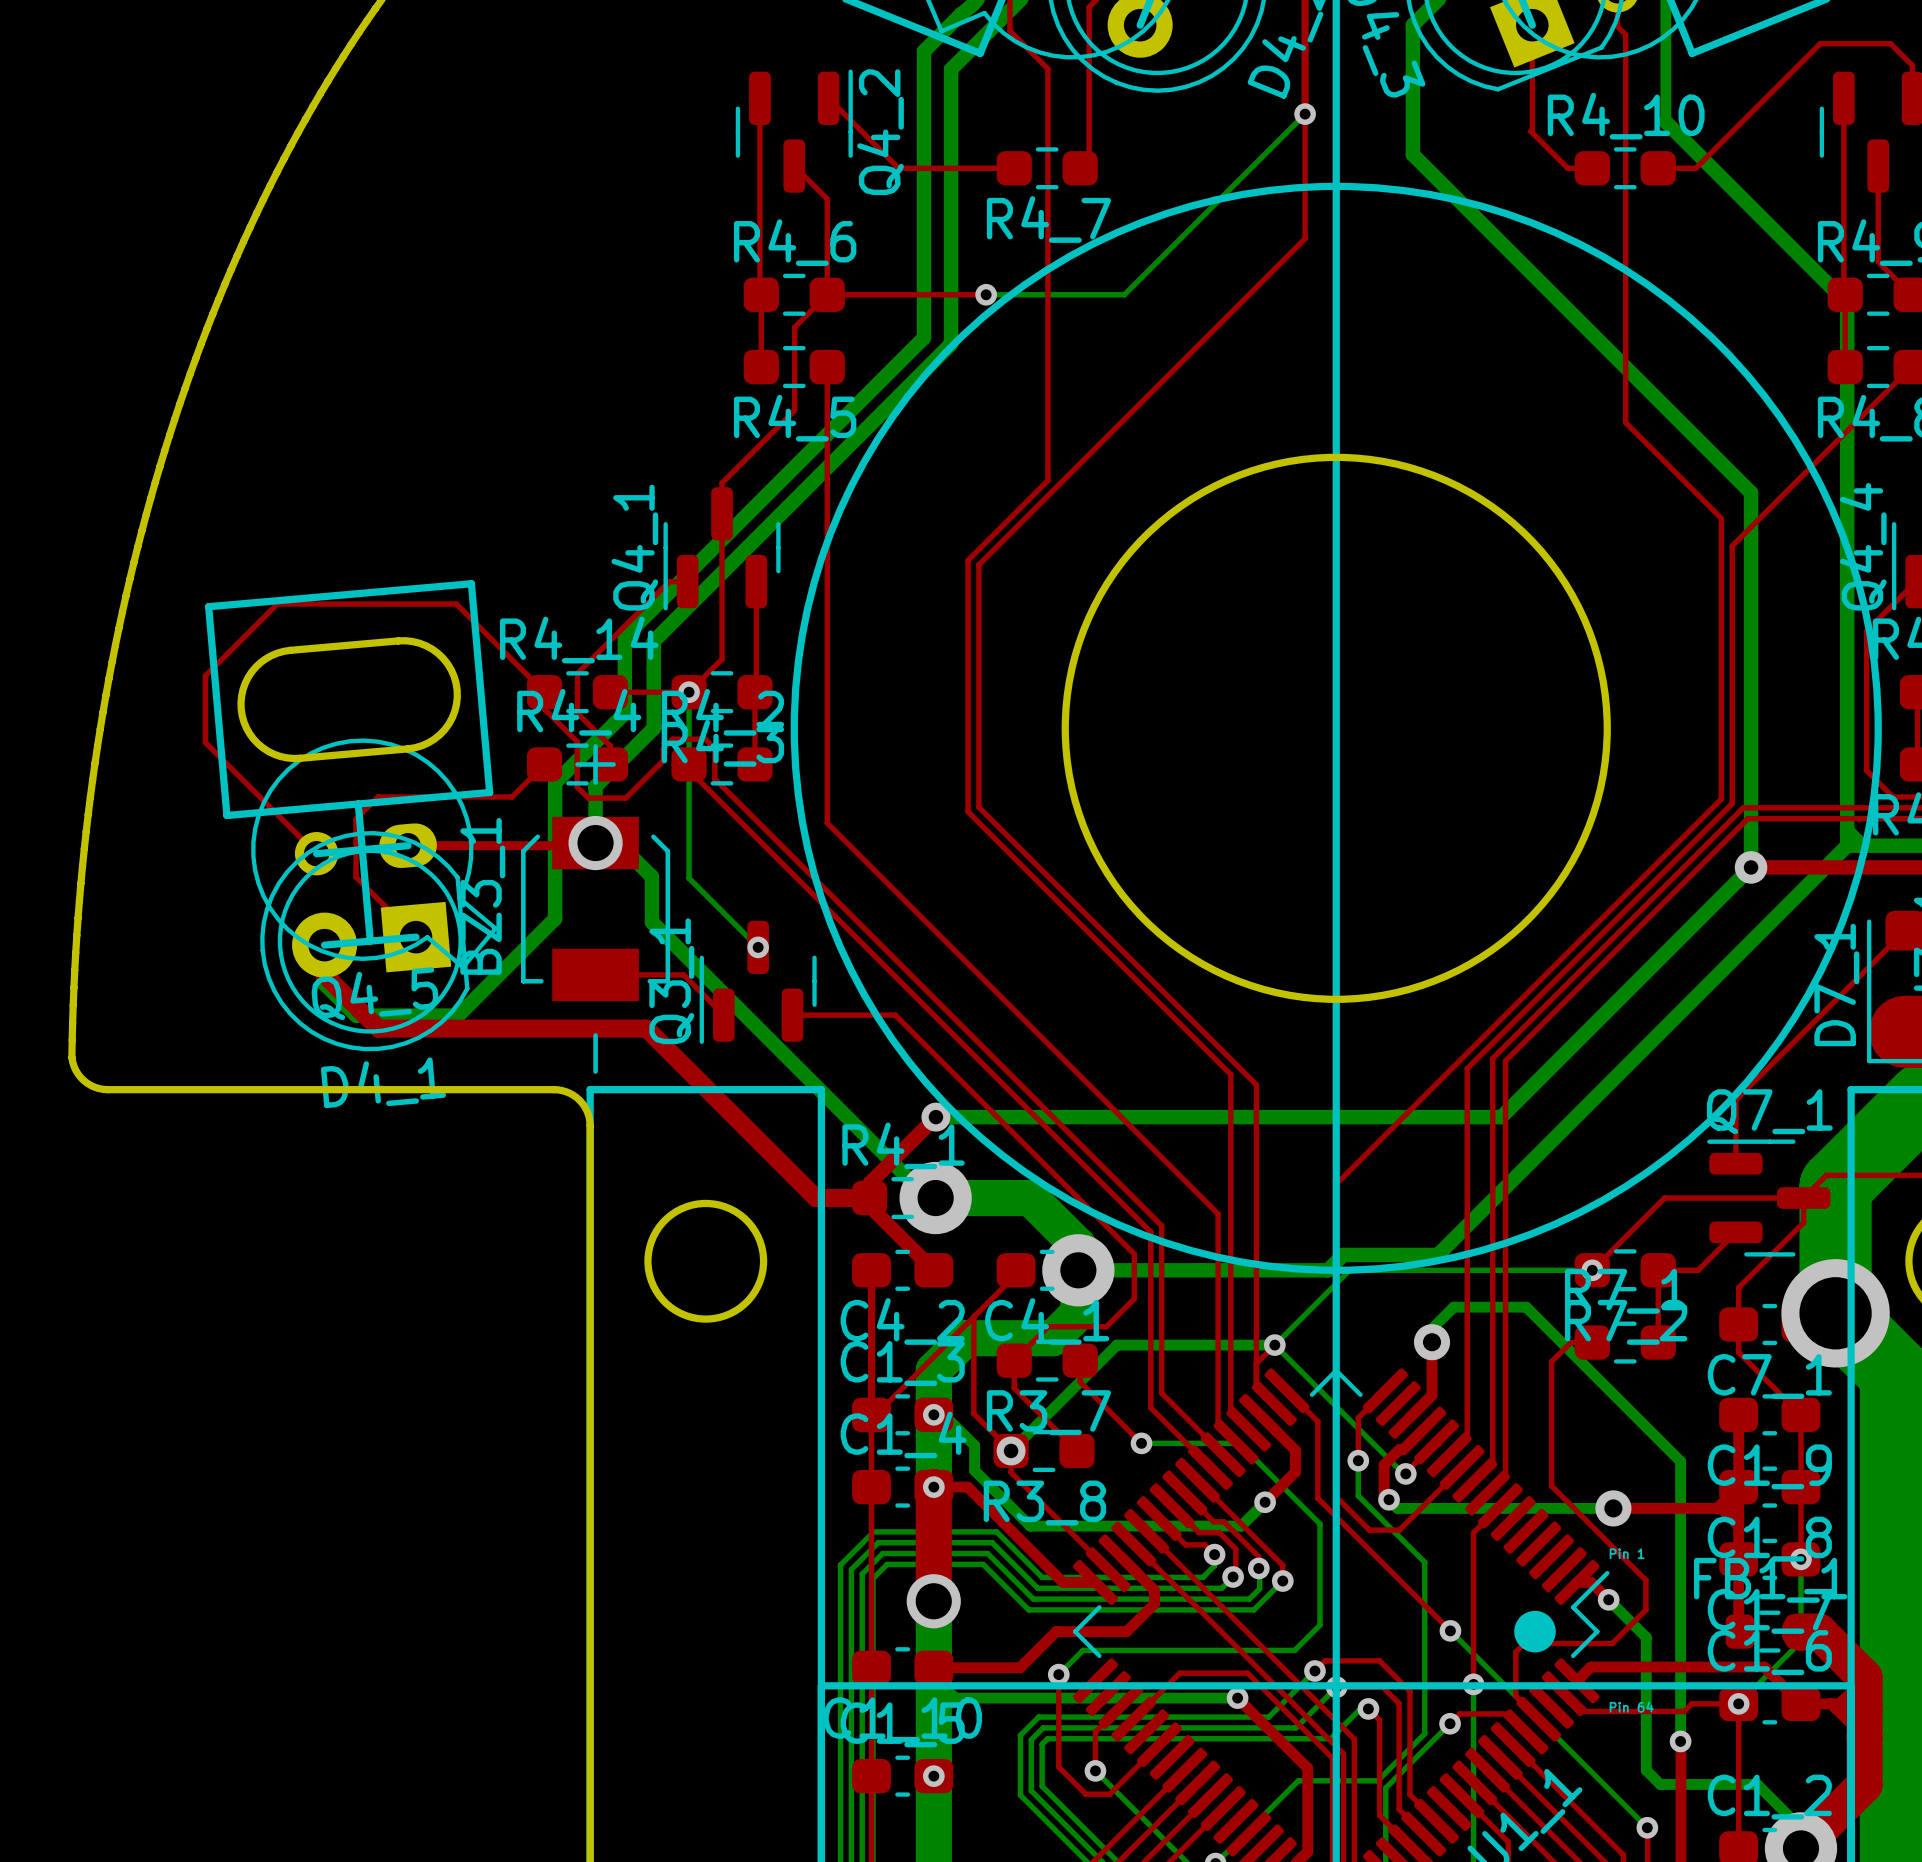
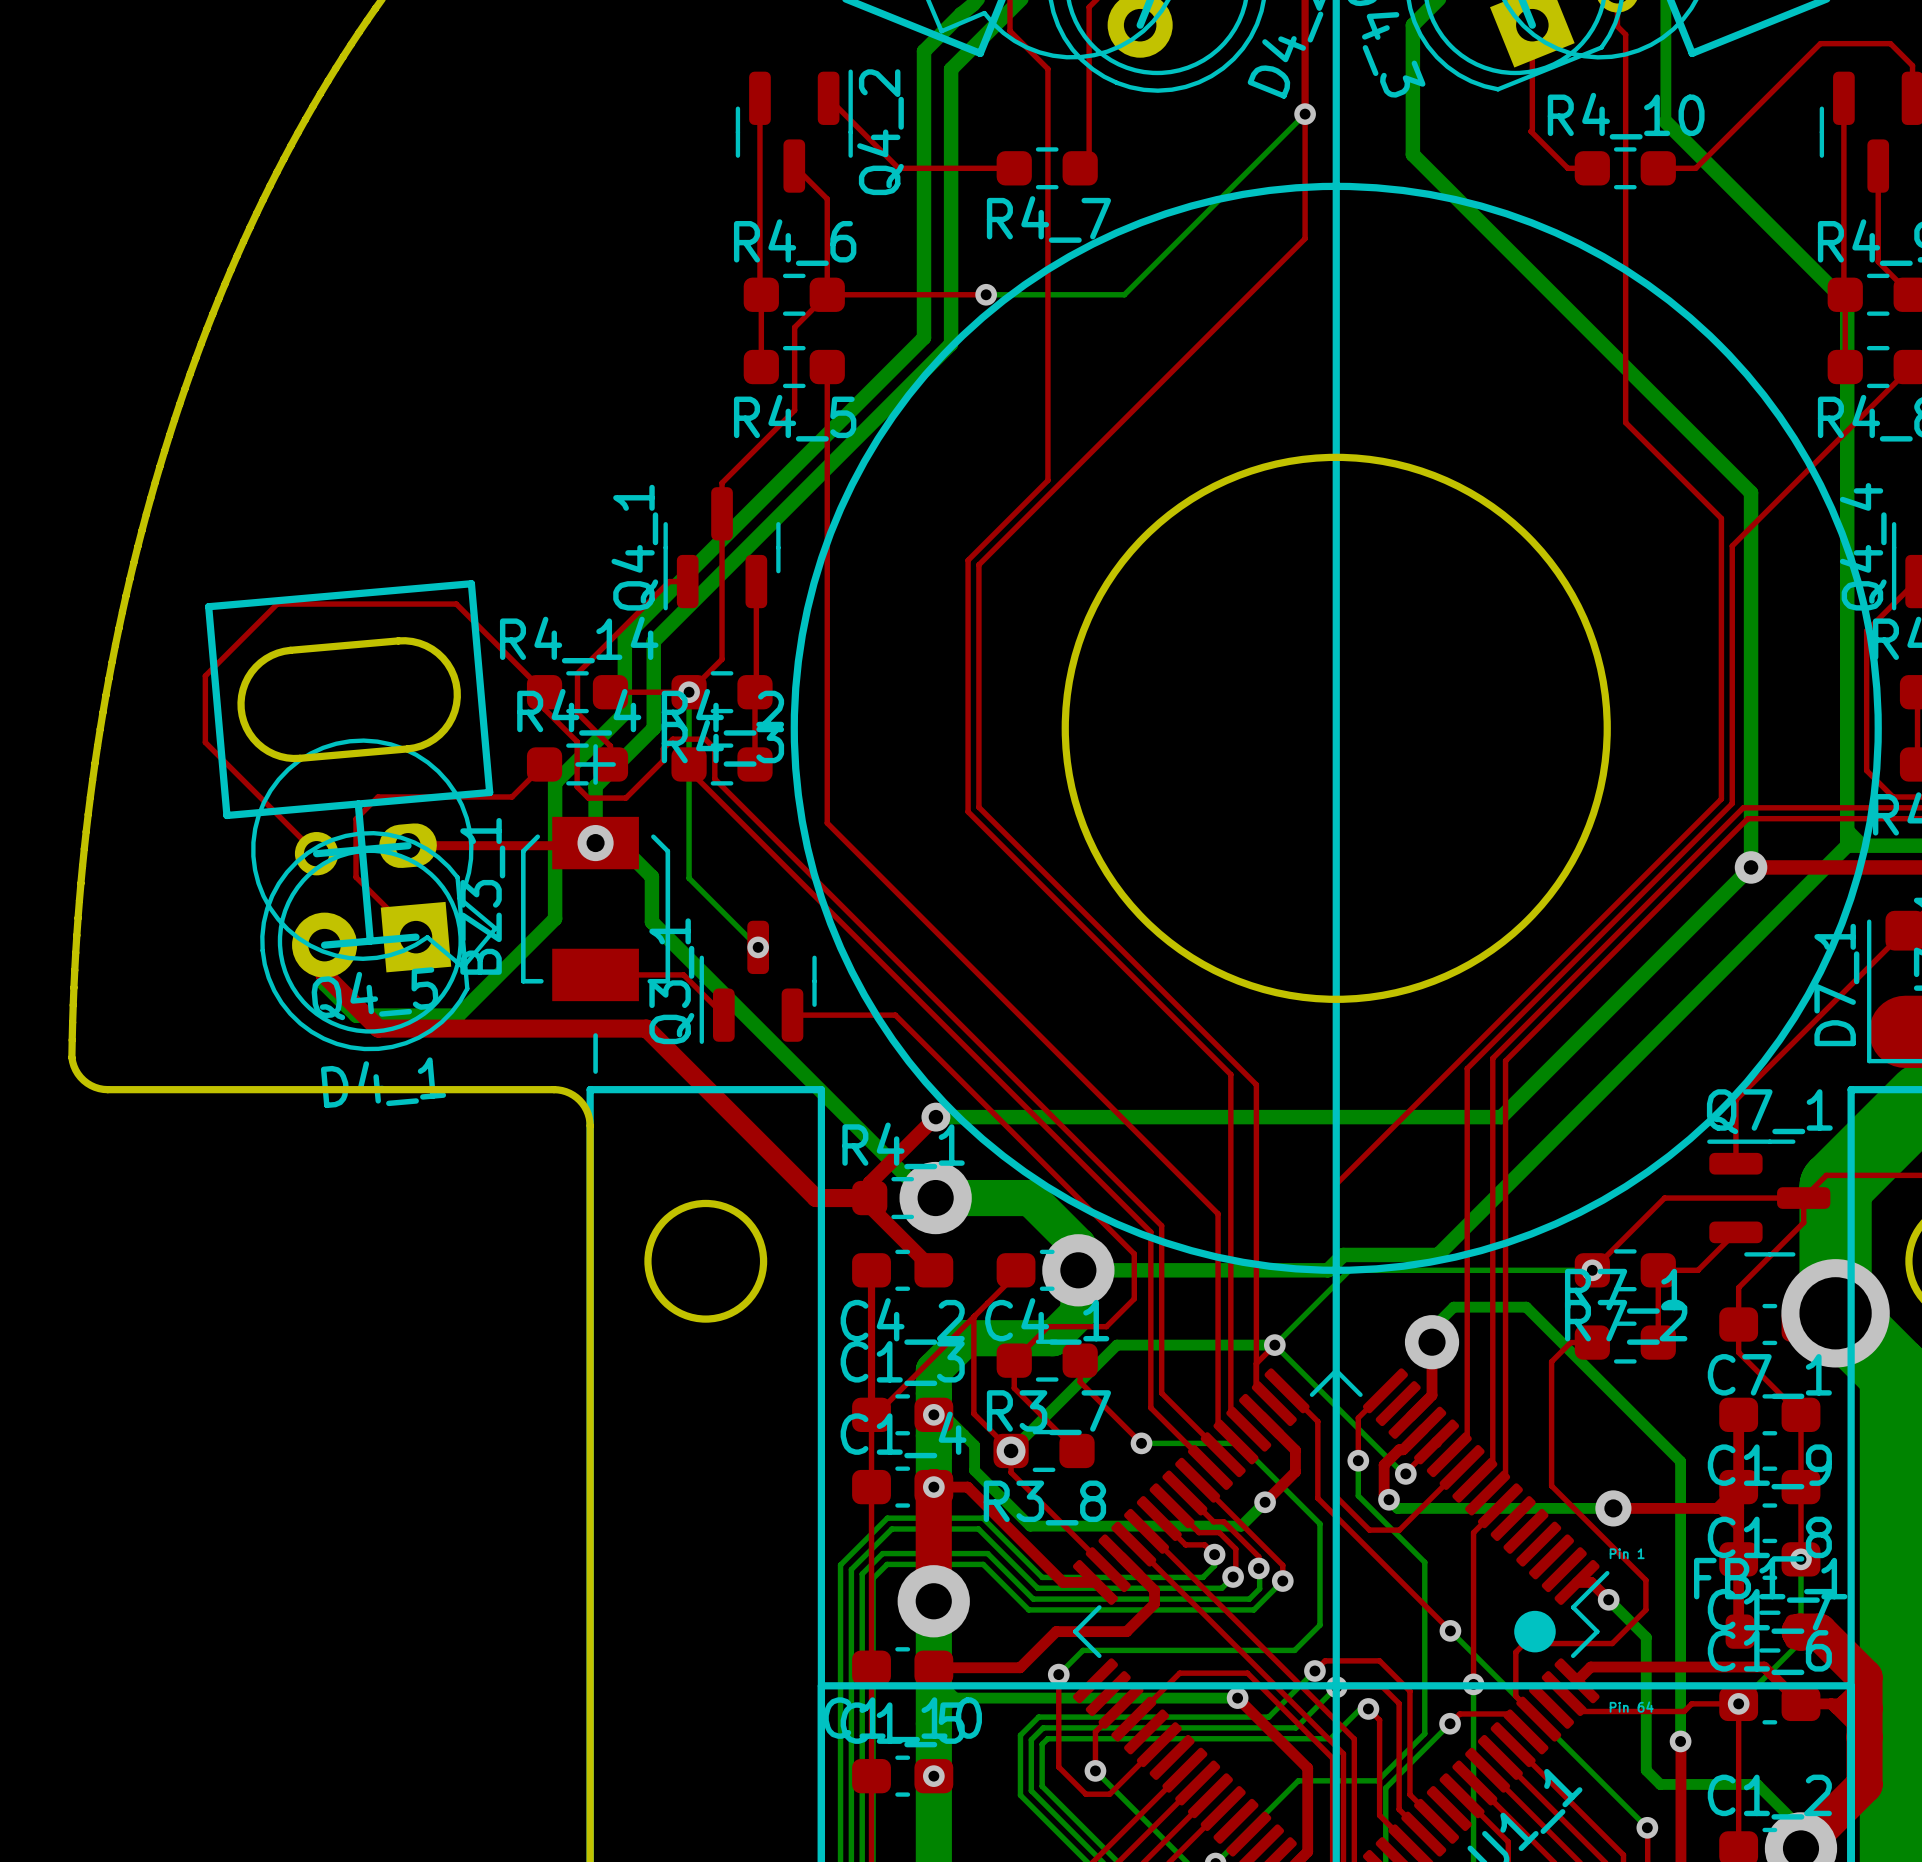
via size: [568, 815, 623, 871] -> [577, 824, 614, 862]
via size: [1413, 1324, 1451, 1361] -> [1404, 1315, 1460, 1370]
bottom track: (873, 1531) (996, 1531) -> (873, 1531) (887, 1518) (983, 1518) (996, 1531)
bottom track: (878, 1542) (992, 1542) -> (878, 1542) (891, 1529) (978, 1529) (992, 1542)
via size: [906, 1574, 961, 1629] -> [897, 1565, 970, 1638]

